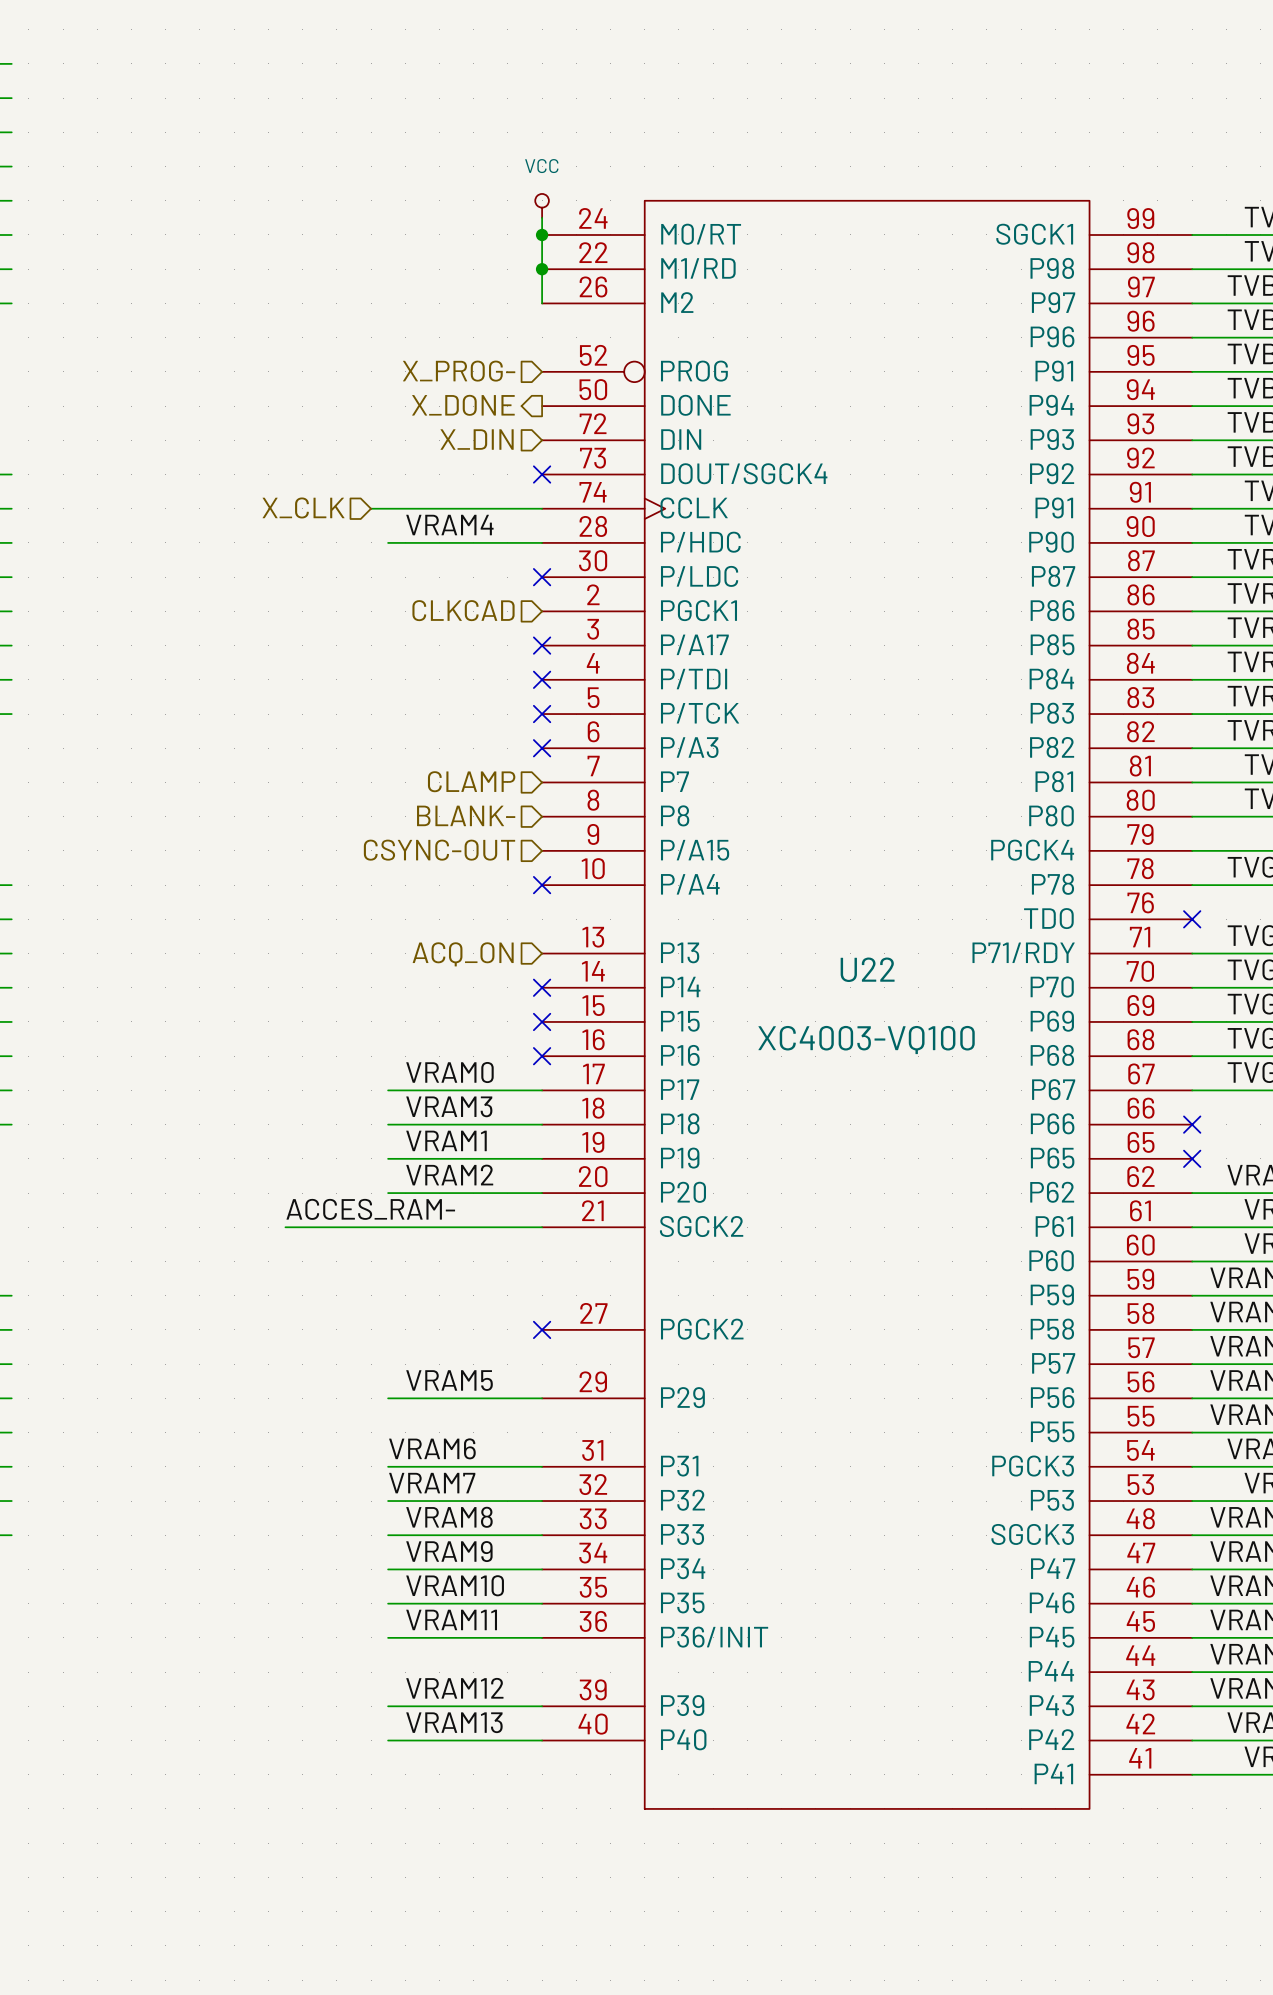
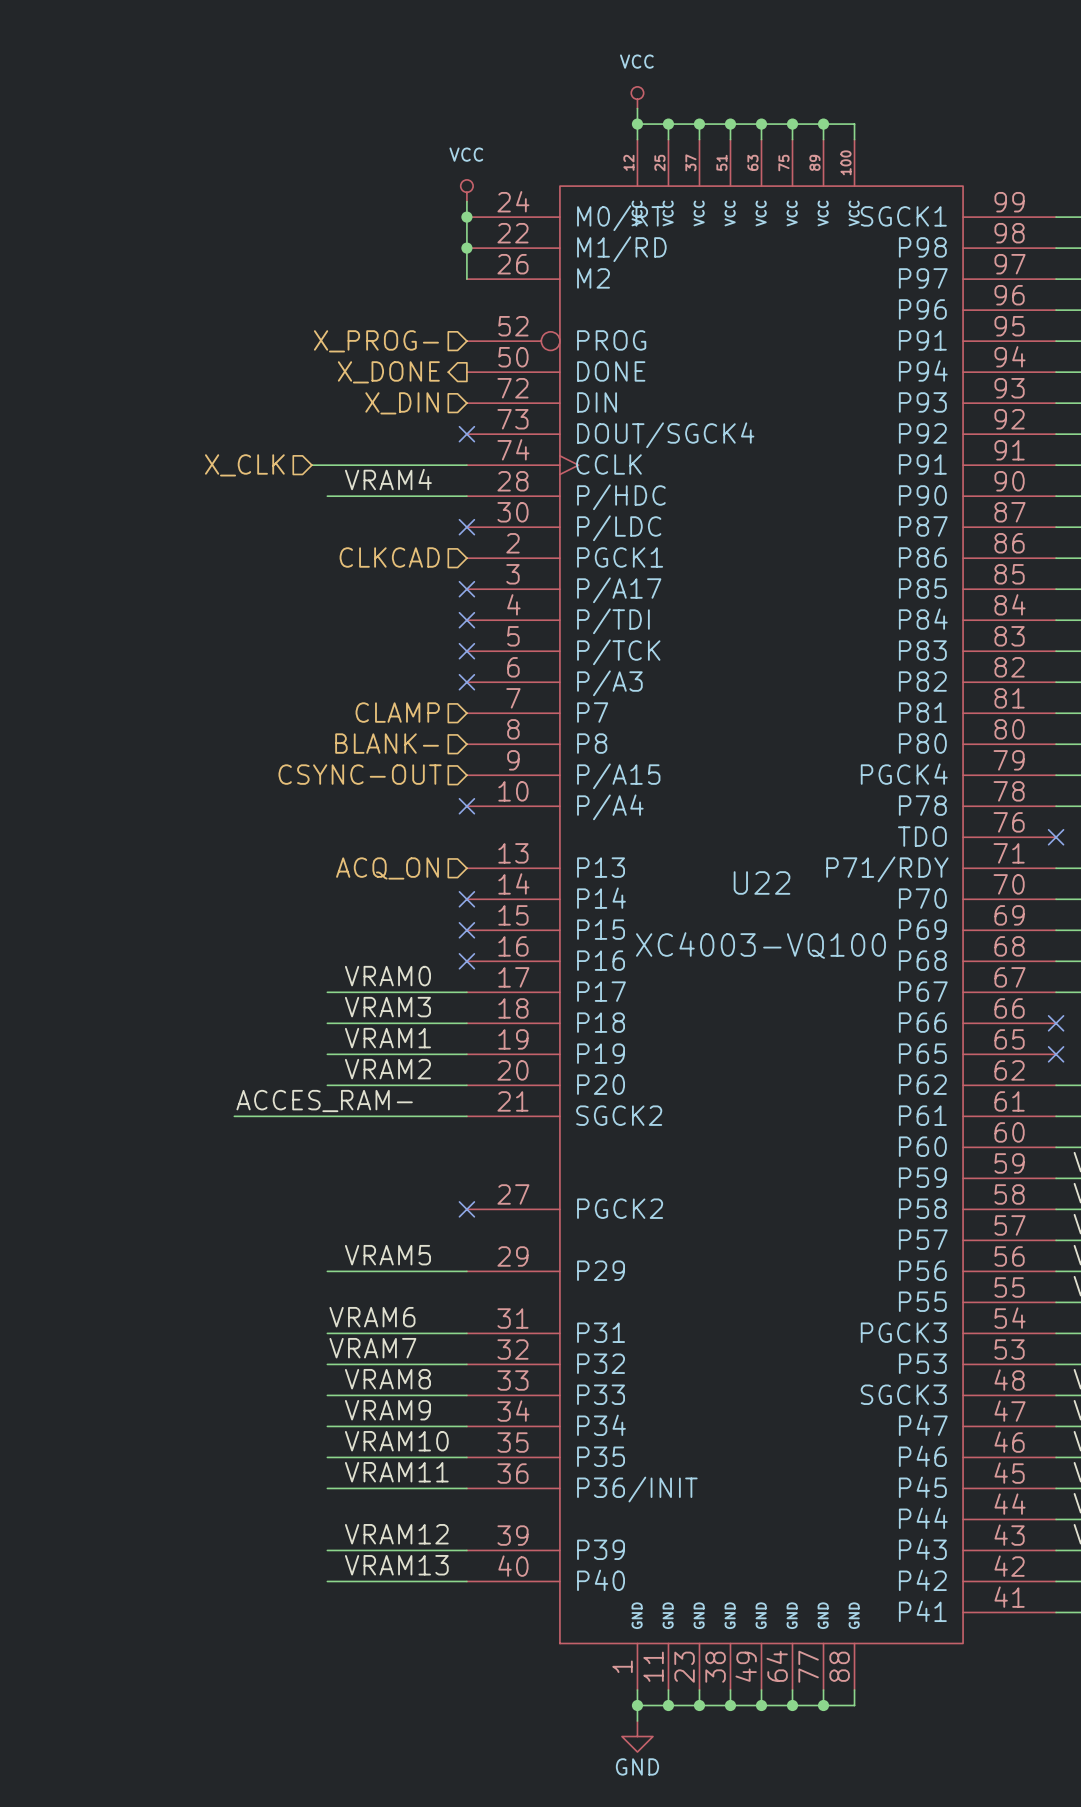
power symbol: none -> VCC (637, 97)
wire: none -> (637, 108) (637, 139)
wire: none -> (637, 124) (854, 124) (854, 139)
junction: none -> (637, 124)
wire: none -> (668, 124) (668, 139)
junction: none -> (668, 124)
wire: none -> (699, 124) (699, 139)
junction: none -> (699, 124)
wire: none -> (730, 124) (730, 139)
junction: none -> (730, 124)
wire: none -> (761, 124) (761, 139)
junction: none -> (761, 124)
wire: none -> (792, 124) (792, 139)
junction: none -> (792, 124)
wire: none -> (823, 124) (823, 139)
junction: none -> (823, 124)
U22 symbol: [542, 200, 1193, 1809] -> [466, 139, 1057, 1691]
wire: none -> (637, 1690) (637, 1721)
wire: none -> (668, 1690) (668, 1705)
wire: none -> (699, 1690) (699, 1705)
wire: none -> (730, 1690) (730, 1705)
wire: none -> (761, 1690) (761, 1705)
wire: none -> (792, 1690) (792, 1705)
wire: none -> (823, 1690) (823, 1705)
wire: none -> (854, 1690) (854, 1705) (637, 1705)
junction: none -> (637, 1705)
junction: none -> (668, 1705)
junction: none -> (699, 1705)
junction: none -> (730, 1705)
junction: none -> (761, 1705)
junction: none -> (792, 1705)
junction: none -> (823, 1705)
power symbol: none -> GND (637, 1736)

